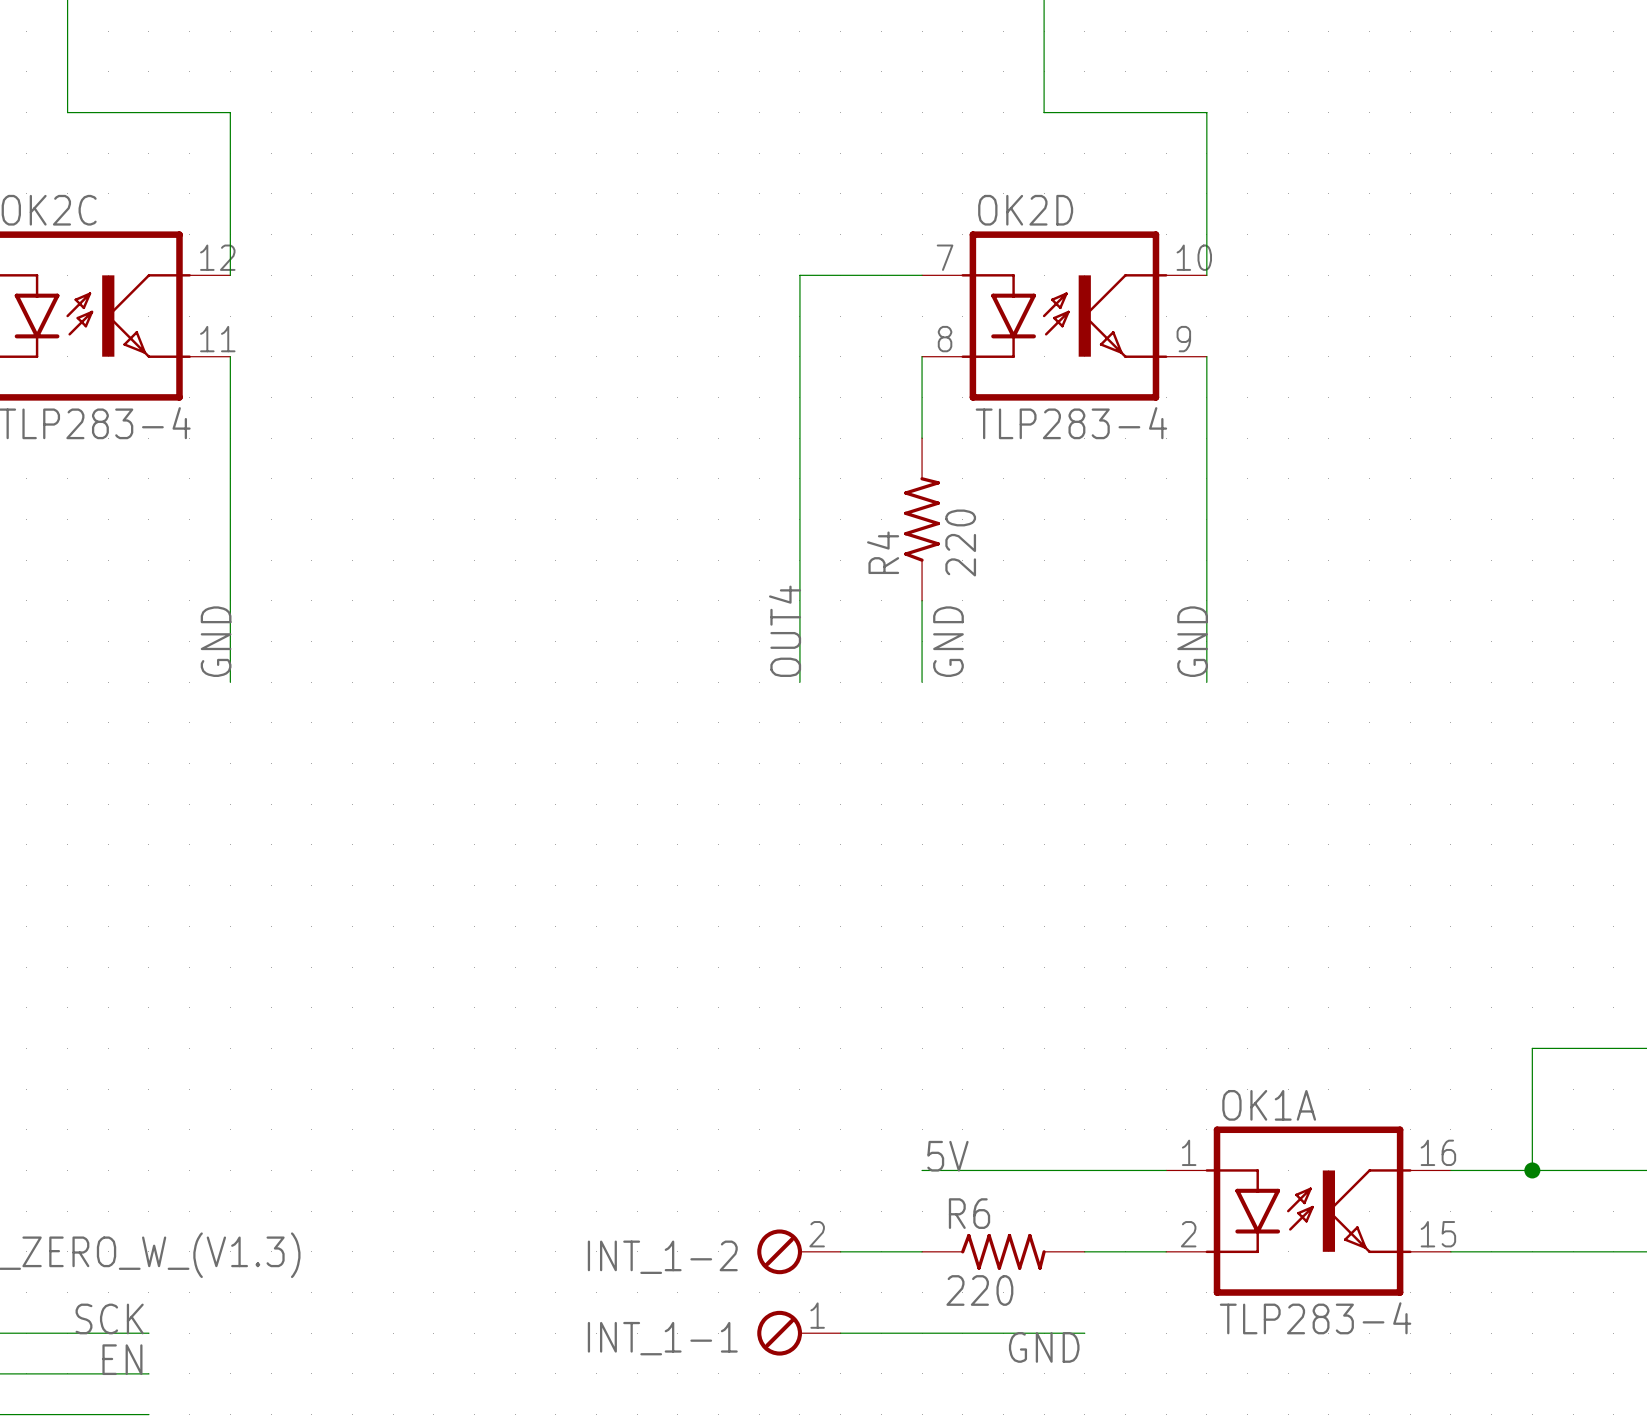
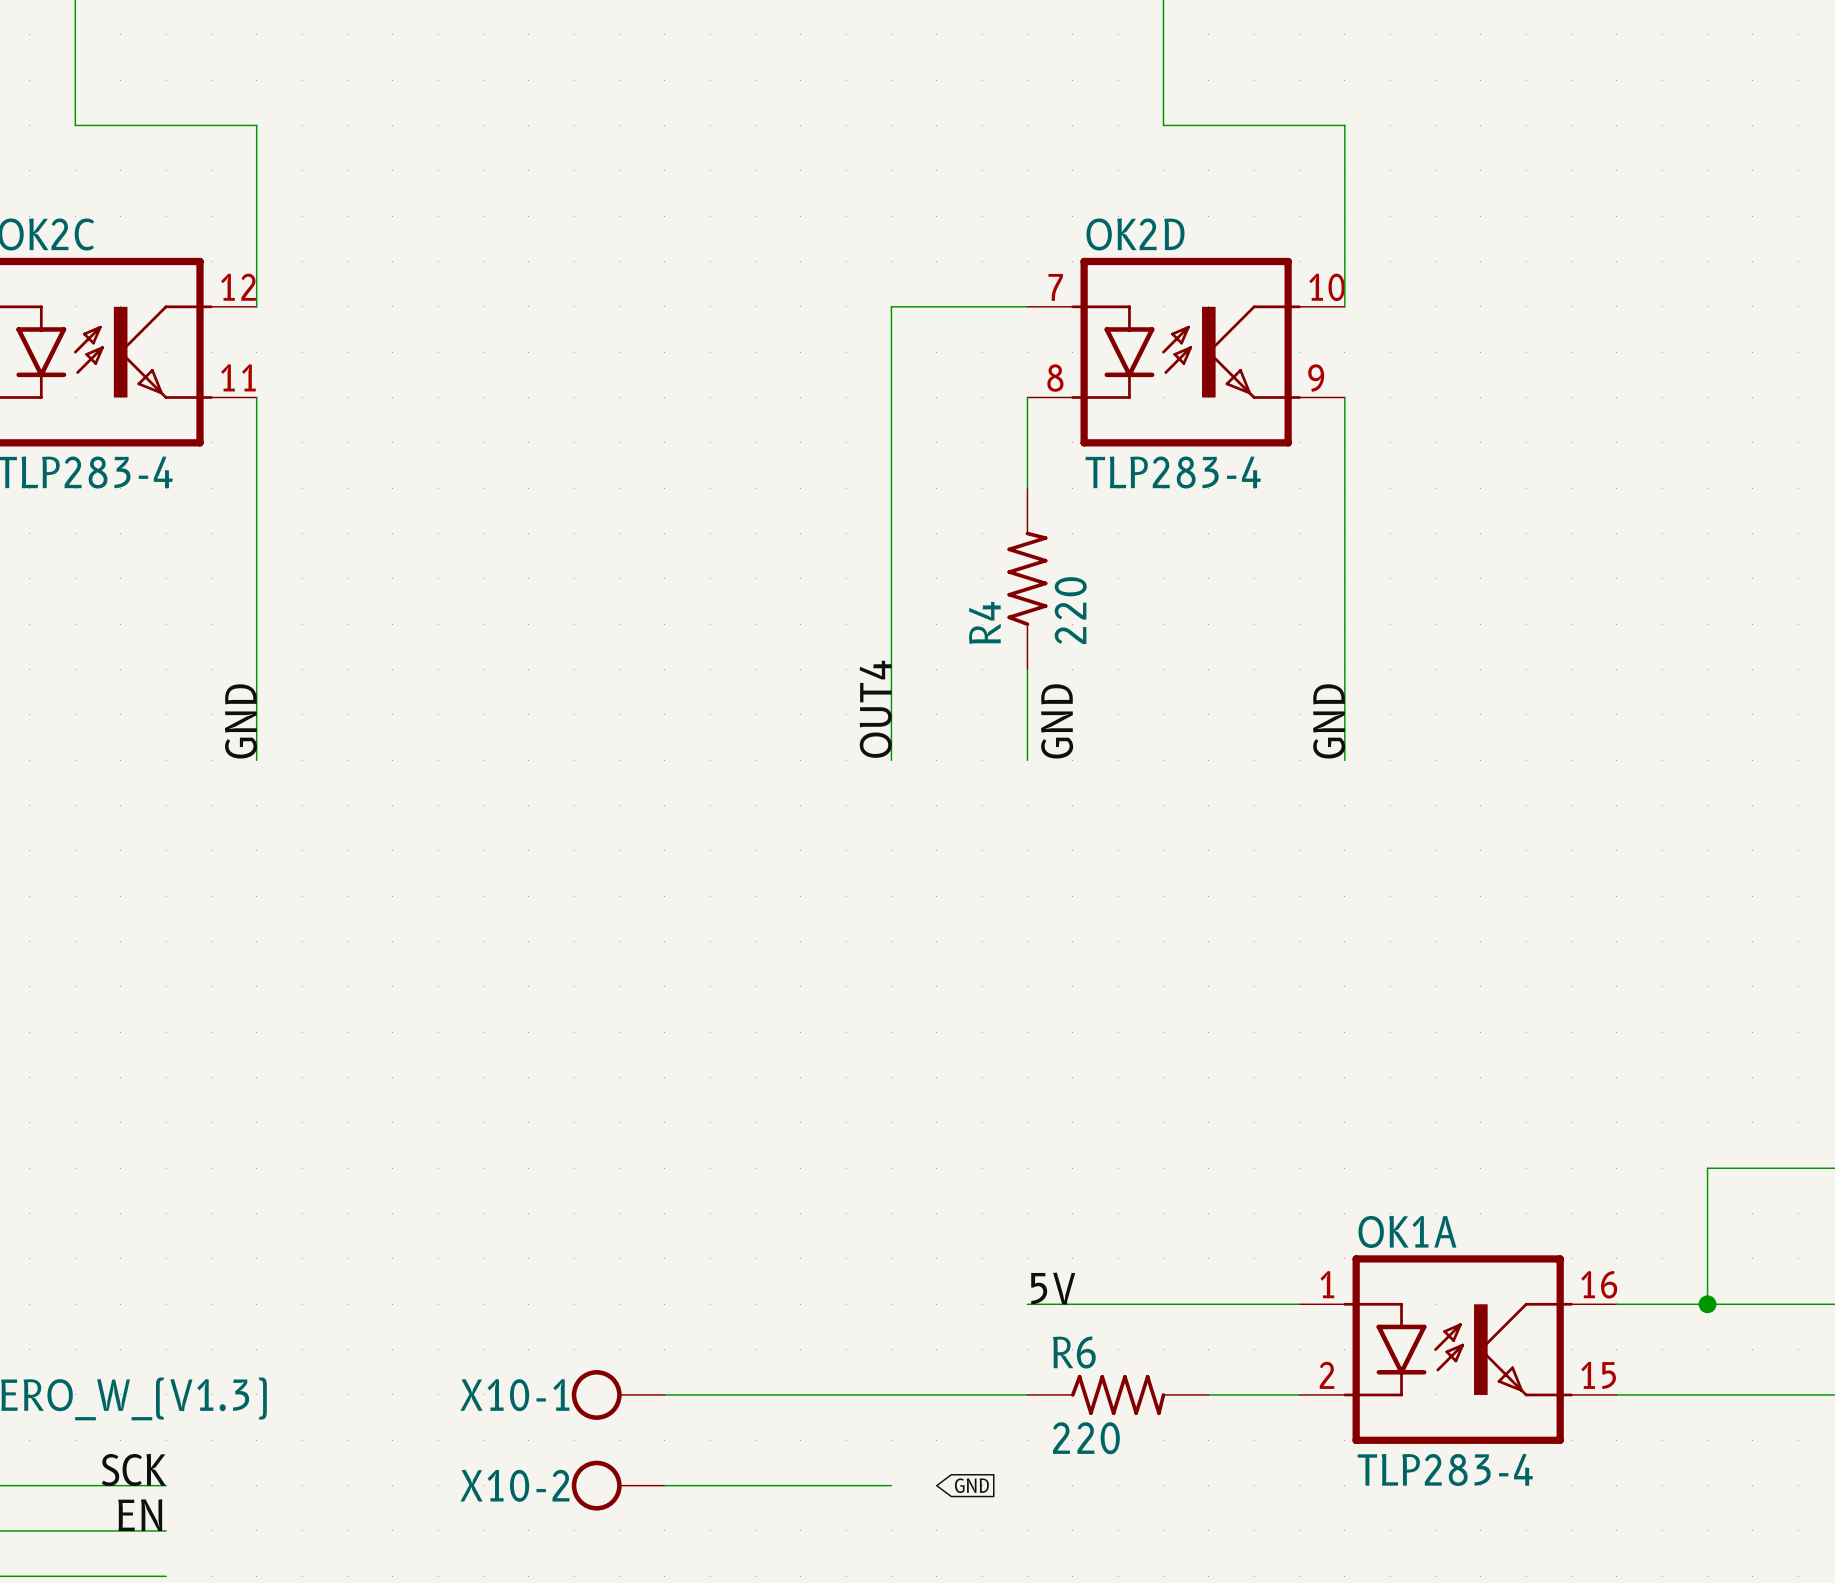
X10-1: none -> (618, 1394)
INT_1-2: (798, 1251) -> none
X10-2: none -> (618, 1485)
wire: none -> (664, 1485) (891, 1485)
INT_1-1: (798, 1333) -> none
wire: (840, 1333) (1084, 1333) -> (664, 1394) (936, 1394)
global label: none -> GND (971, 1485)
label: GND (1044, 1347) -> none

